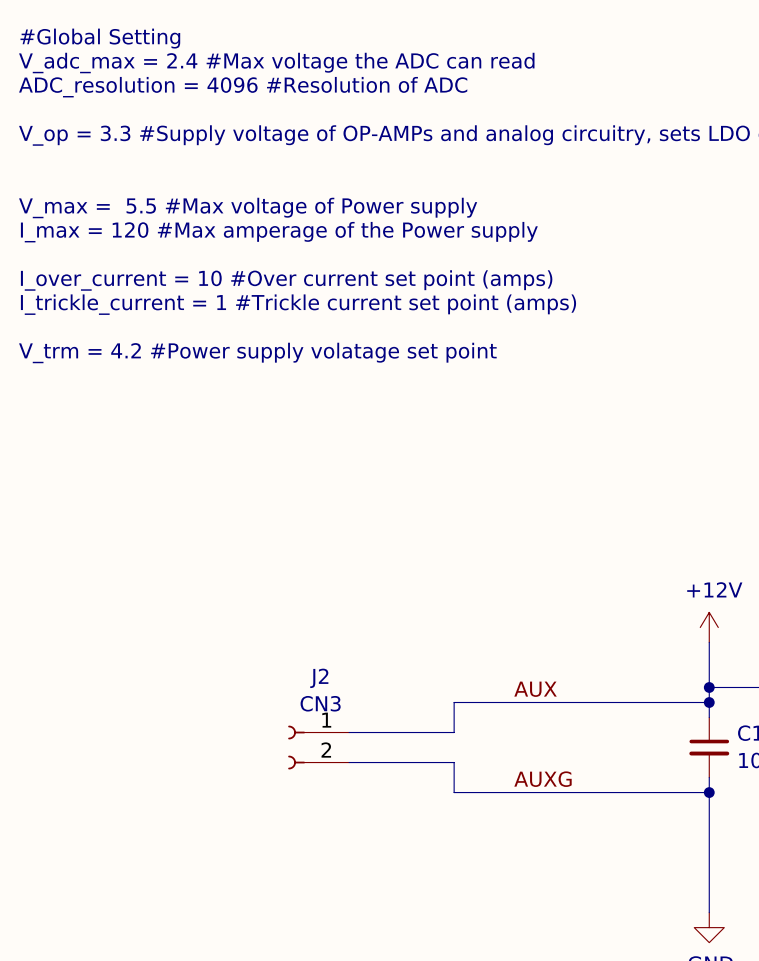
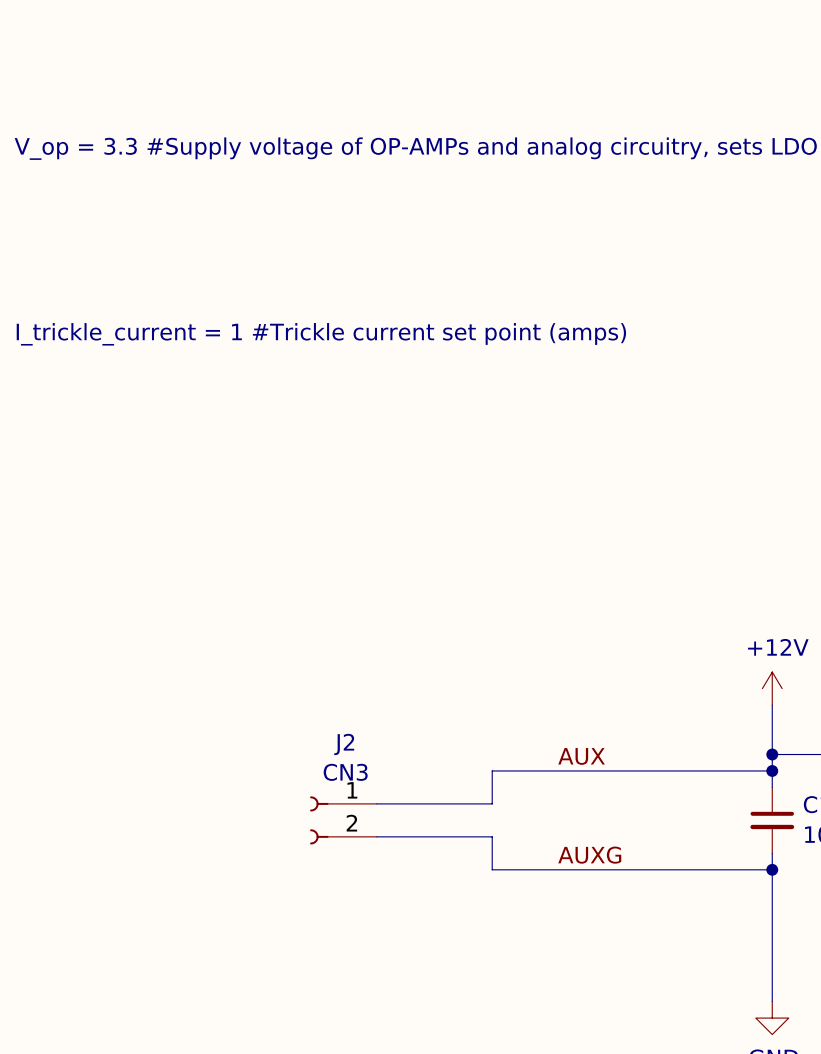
text: #Global Setting (100, 38) -> none
text: V_adc_max = 2.4 #Max voltage the ADC can read (276, 63) -> none
text: ADC_resolution = 4096 #Resolution of ADC (243, 87) -> none
text: V_max = 5.5 #Max voltage of Power supply (248, 208) -> none
text: I_max = 120 #Max amperage of the Power supply (279, 232) -> none
text: I_over_current = 10 #Over current set point (amps) (286, 280) -> none
text: V_trm = 4.2 #Power supply volatage set point (257, 352) -> none

